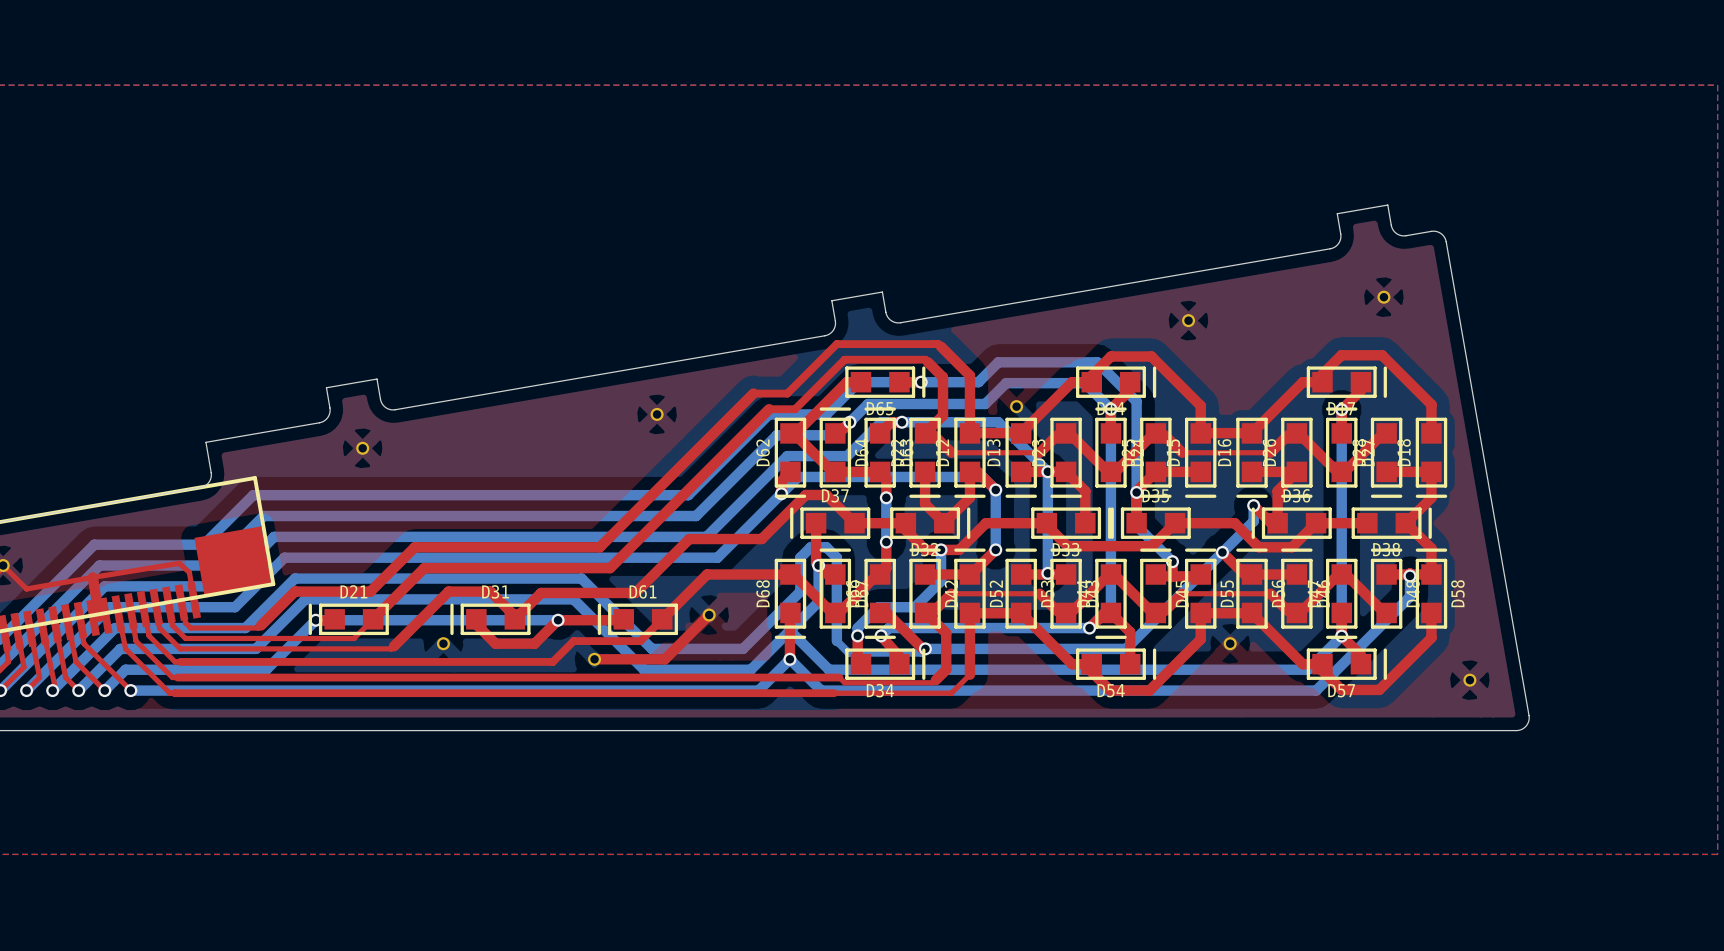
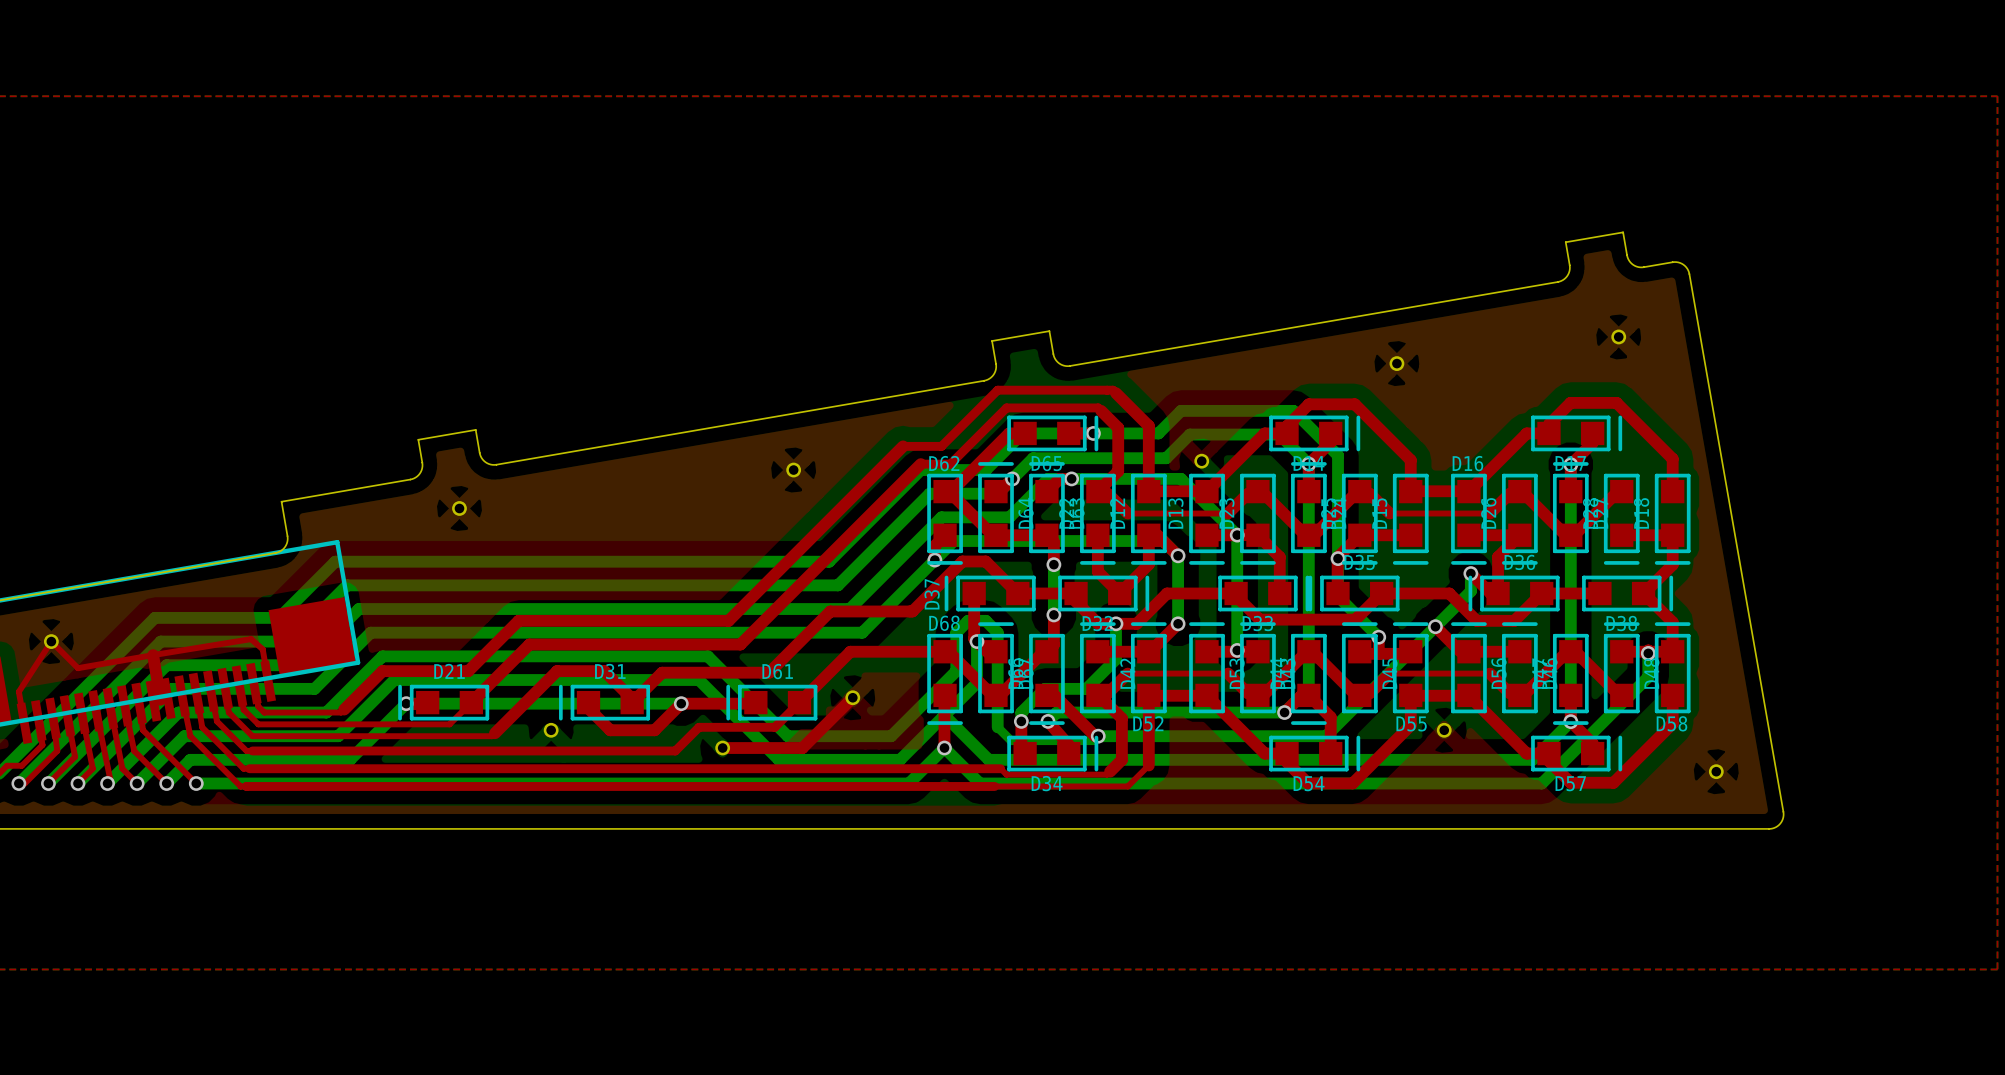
D62 name rotation: 0° (763, 452) -> 90° clockwise (944, 463)
D62 name position: D62 (763, 452) -> D62 (944, 463)
D16 name rotation: 0° (1224, 452) -> 90° clockwise (1467, 463)
D16 name position: D16 (1224, 452) -> D16 (1467, 463)
D37 name rotation: 0° (835, 495) -> 90° counterclockwise (932, 594)
D37 name position: D37 (835, 495) -> D37 (932, 594)
D68 name rotation: 0° (763, 593) -> 90° clockwise (944, 623)
D68 name position: D68 (763, 593) -> D68 (944, 623)
D52 name rotation: 0° (996, 593) -> 90° clockwise (1148, 723)
D52 name position: D52 (996, 593) -> D52 (1148, 723)
D55 name rotation: 0° (1227, 593) -> 90° clockwise (1411, 723)
D55 name position: D55 (1227, 593) -> D55 (1411, 723)
D58 name rotation: 0° (1457, 593) -> 90° clockwise (1671, 723)
D58 name position: D58 (1457, 593) -> D58 (1671, 723)

